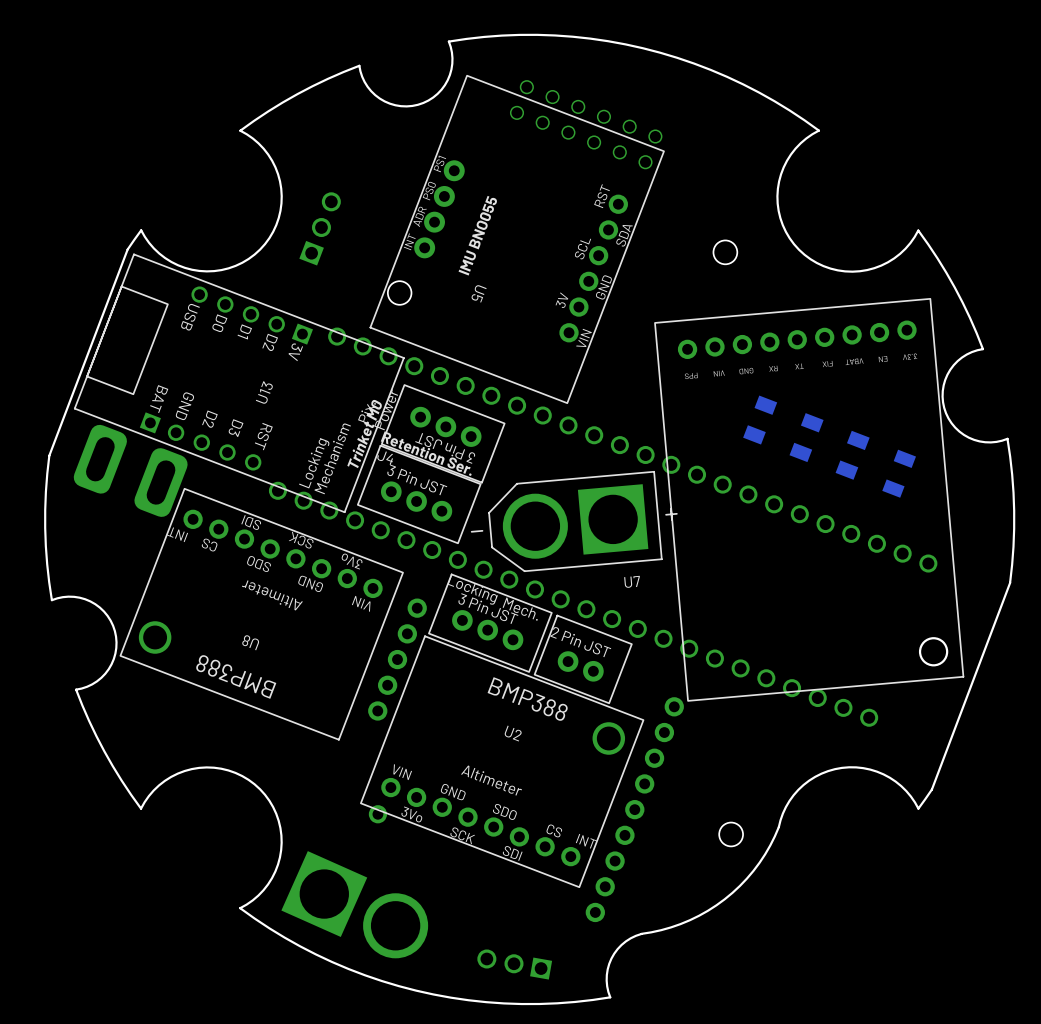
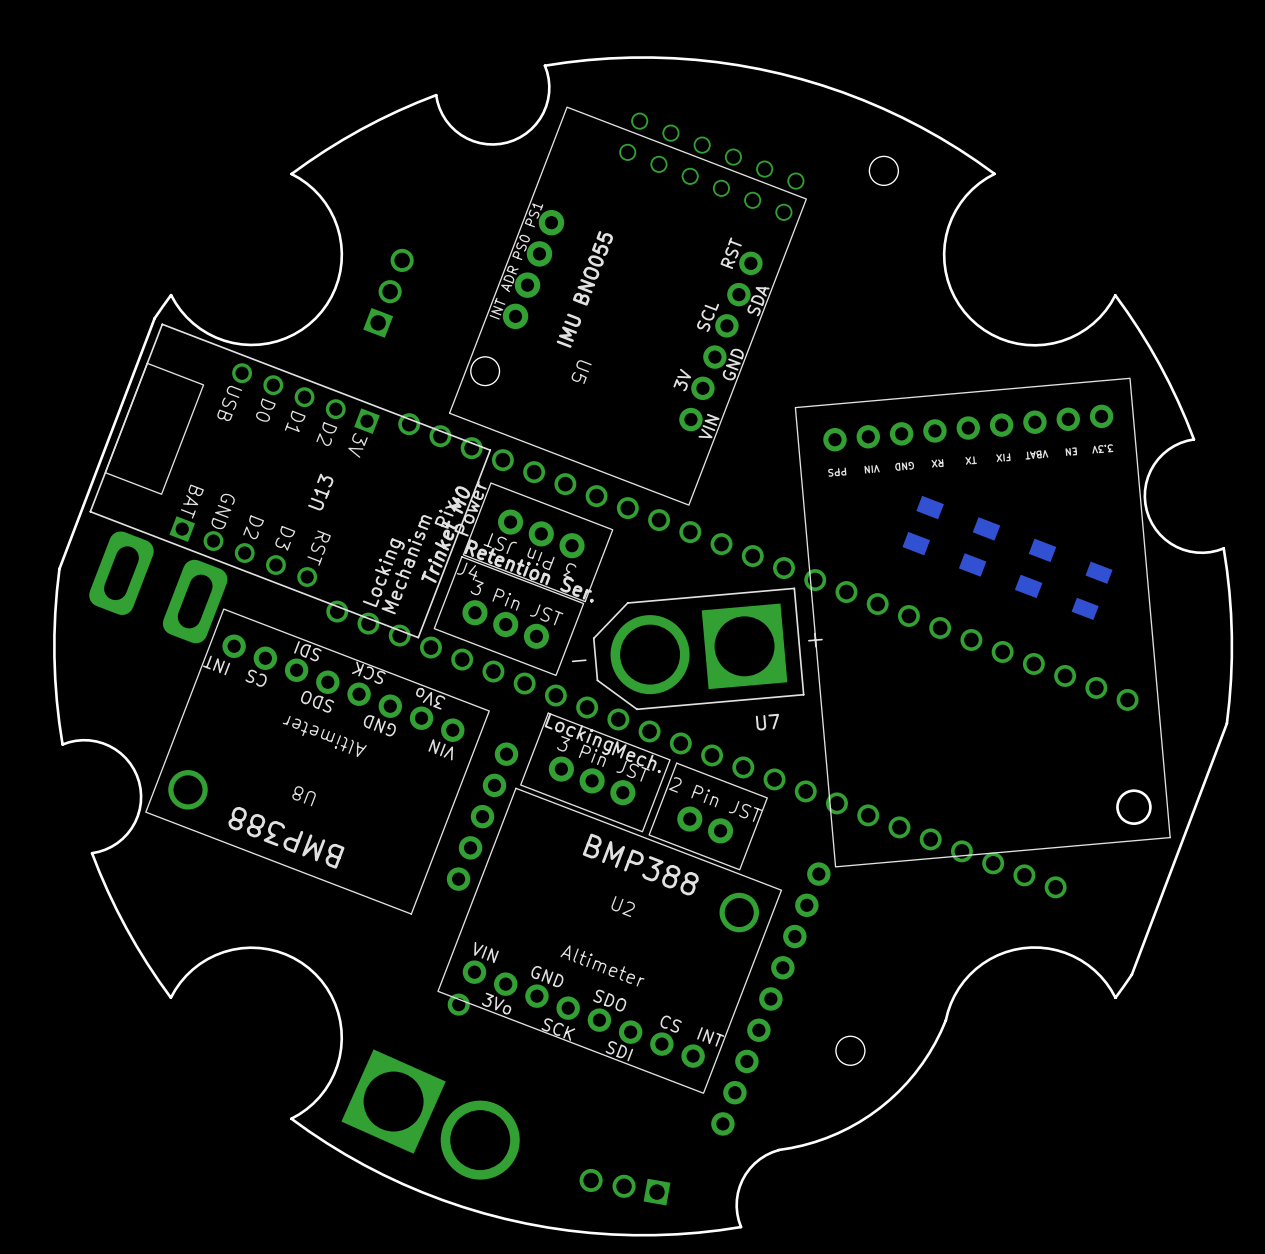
round board edge position: (725, 252) -> (883, 170)
round board edge position: (731, 834) -> (850, 1050)

